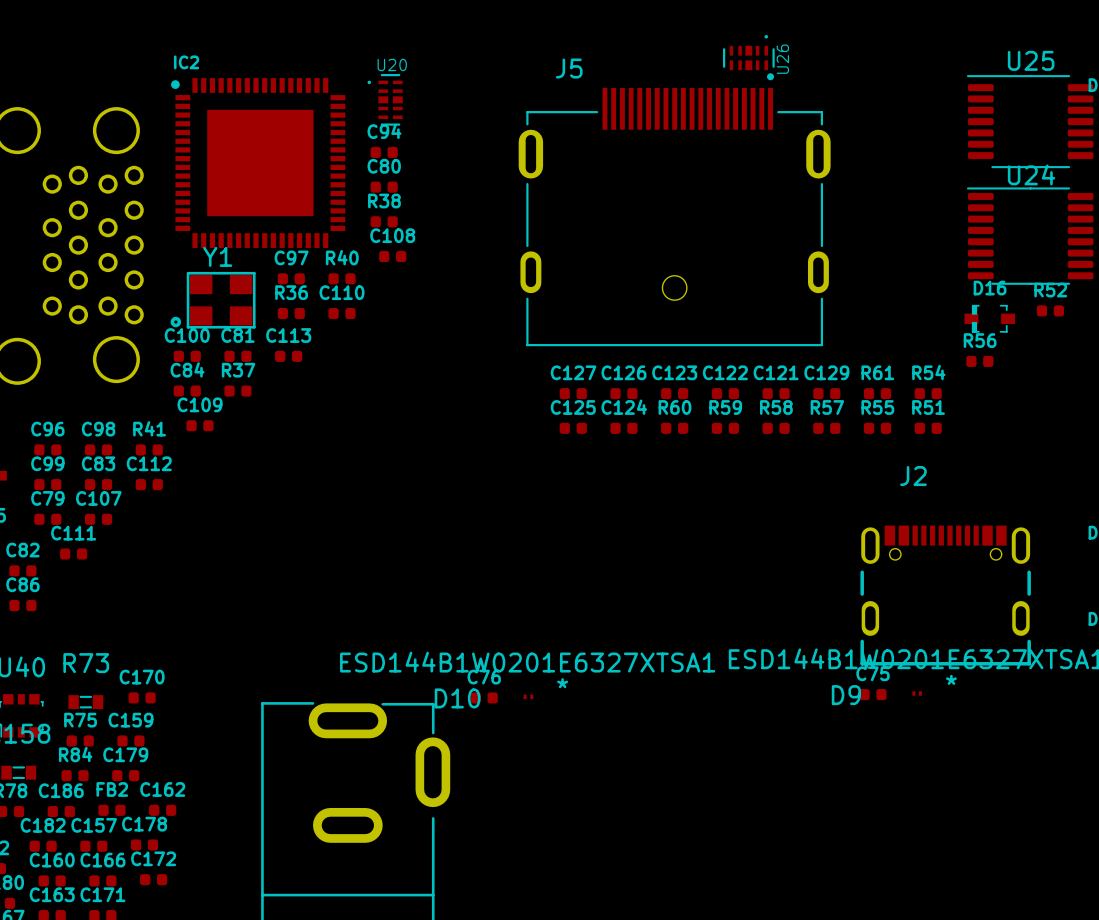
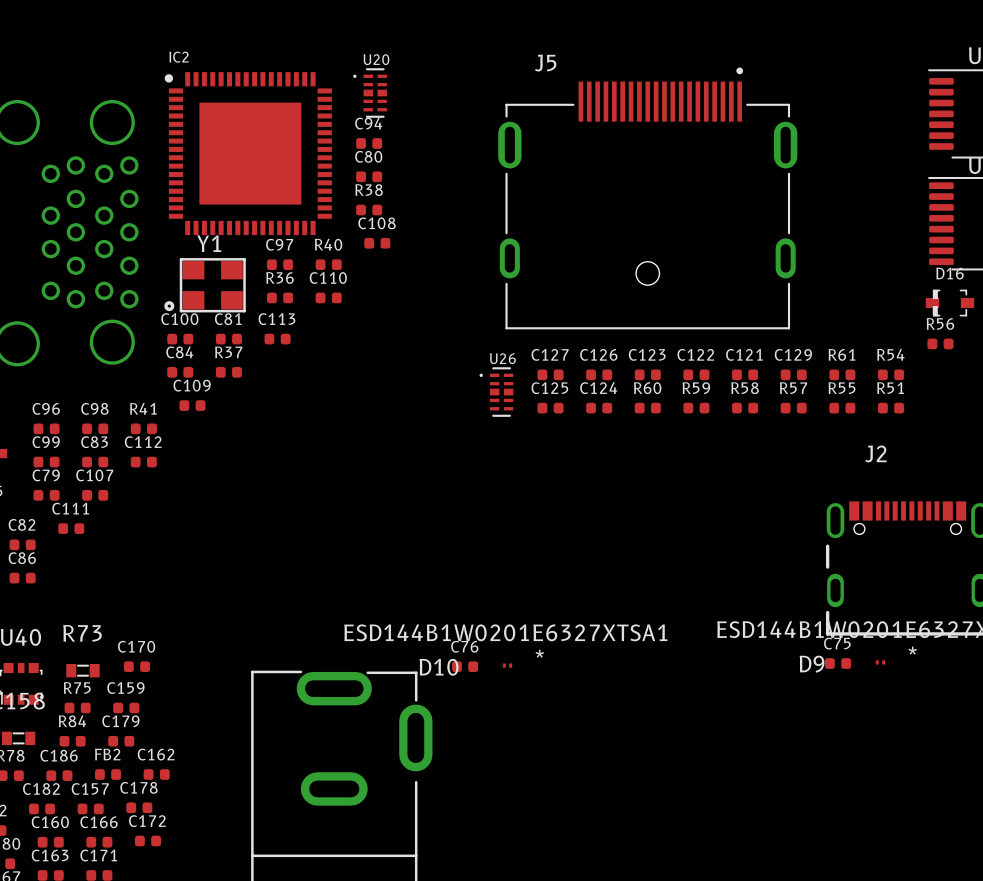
U26 rotation: 0° (748, 52) -> 90° counterclockwise (496, 392)
U26 position: (748, 52) -> (496, 392)

